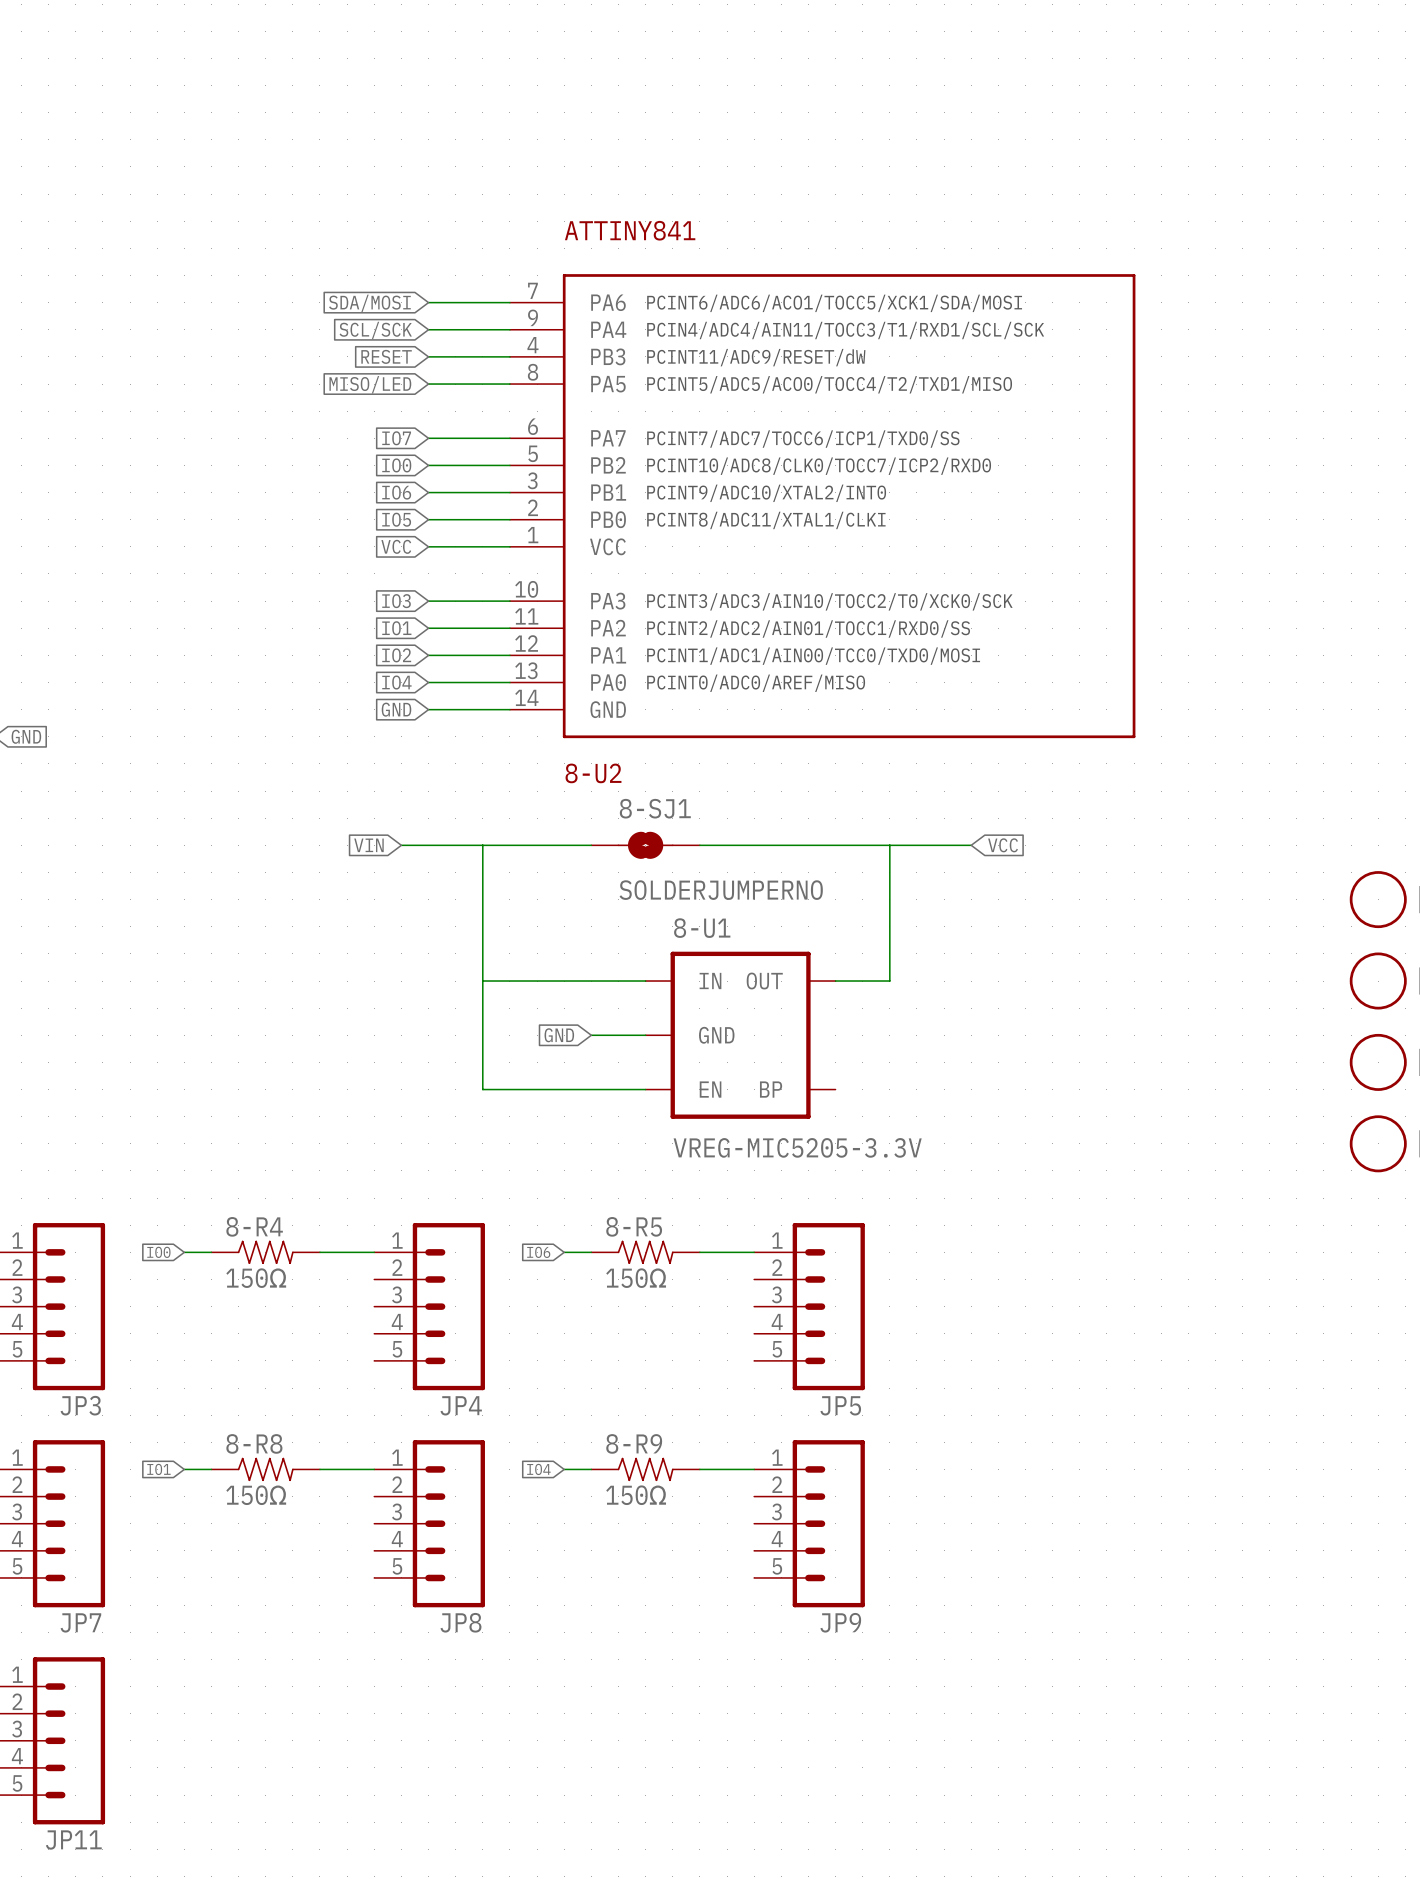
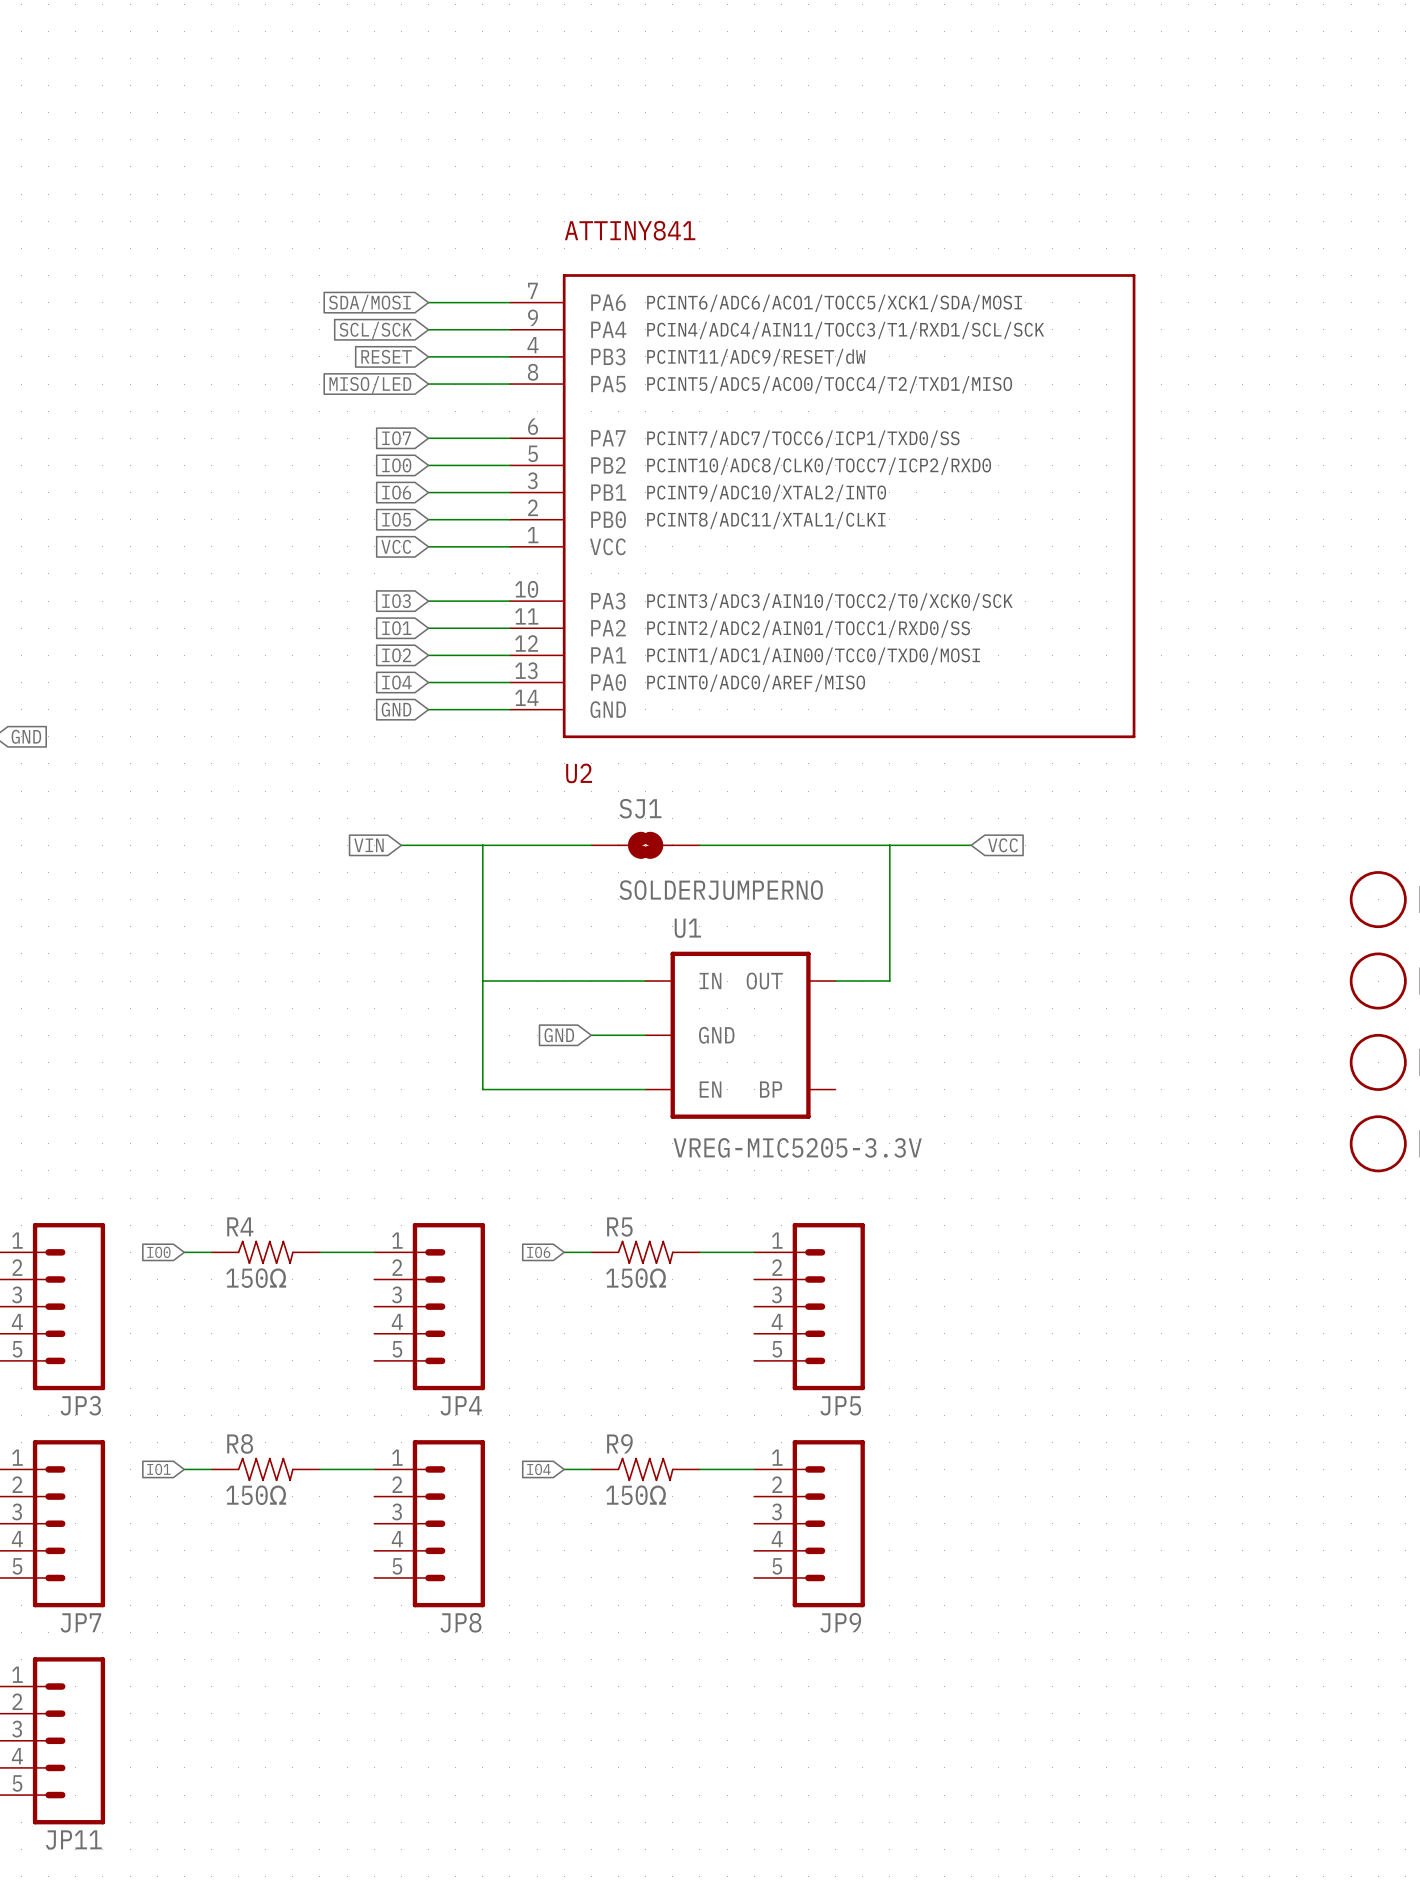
8-U2 name: 8-U2 (593, 773) -> U2 (579, 773)
8-SJ1 name: 8-SJ1 (655, 808) -> SJ1 (640, 808)
8-U1 name: 8-U1 (702, 928) -> U1 (687, 928)
8-R4 name: 8-R4 (254, 1226) -> R4 (240, 1226)
8-R5 name: 8-R5 (634, 1226) -> R5 (619, 1227)
8-R8 name: 8-R8 (254, 1443) -> R8 (240, 1443)
8-R9 name: 8-R9 (634, 1443) -> R9 (619, 1443)

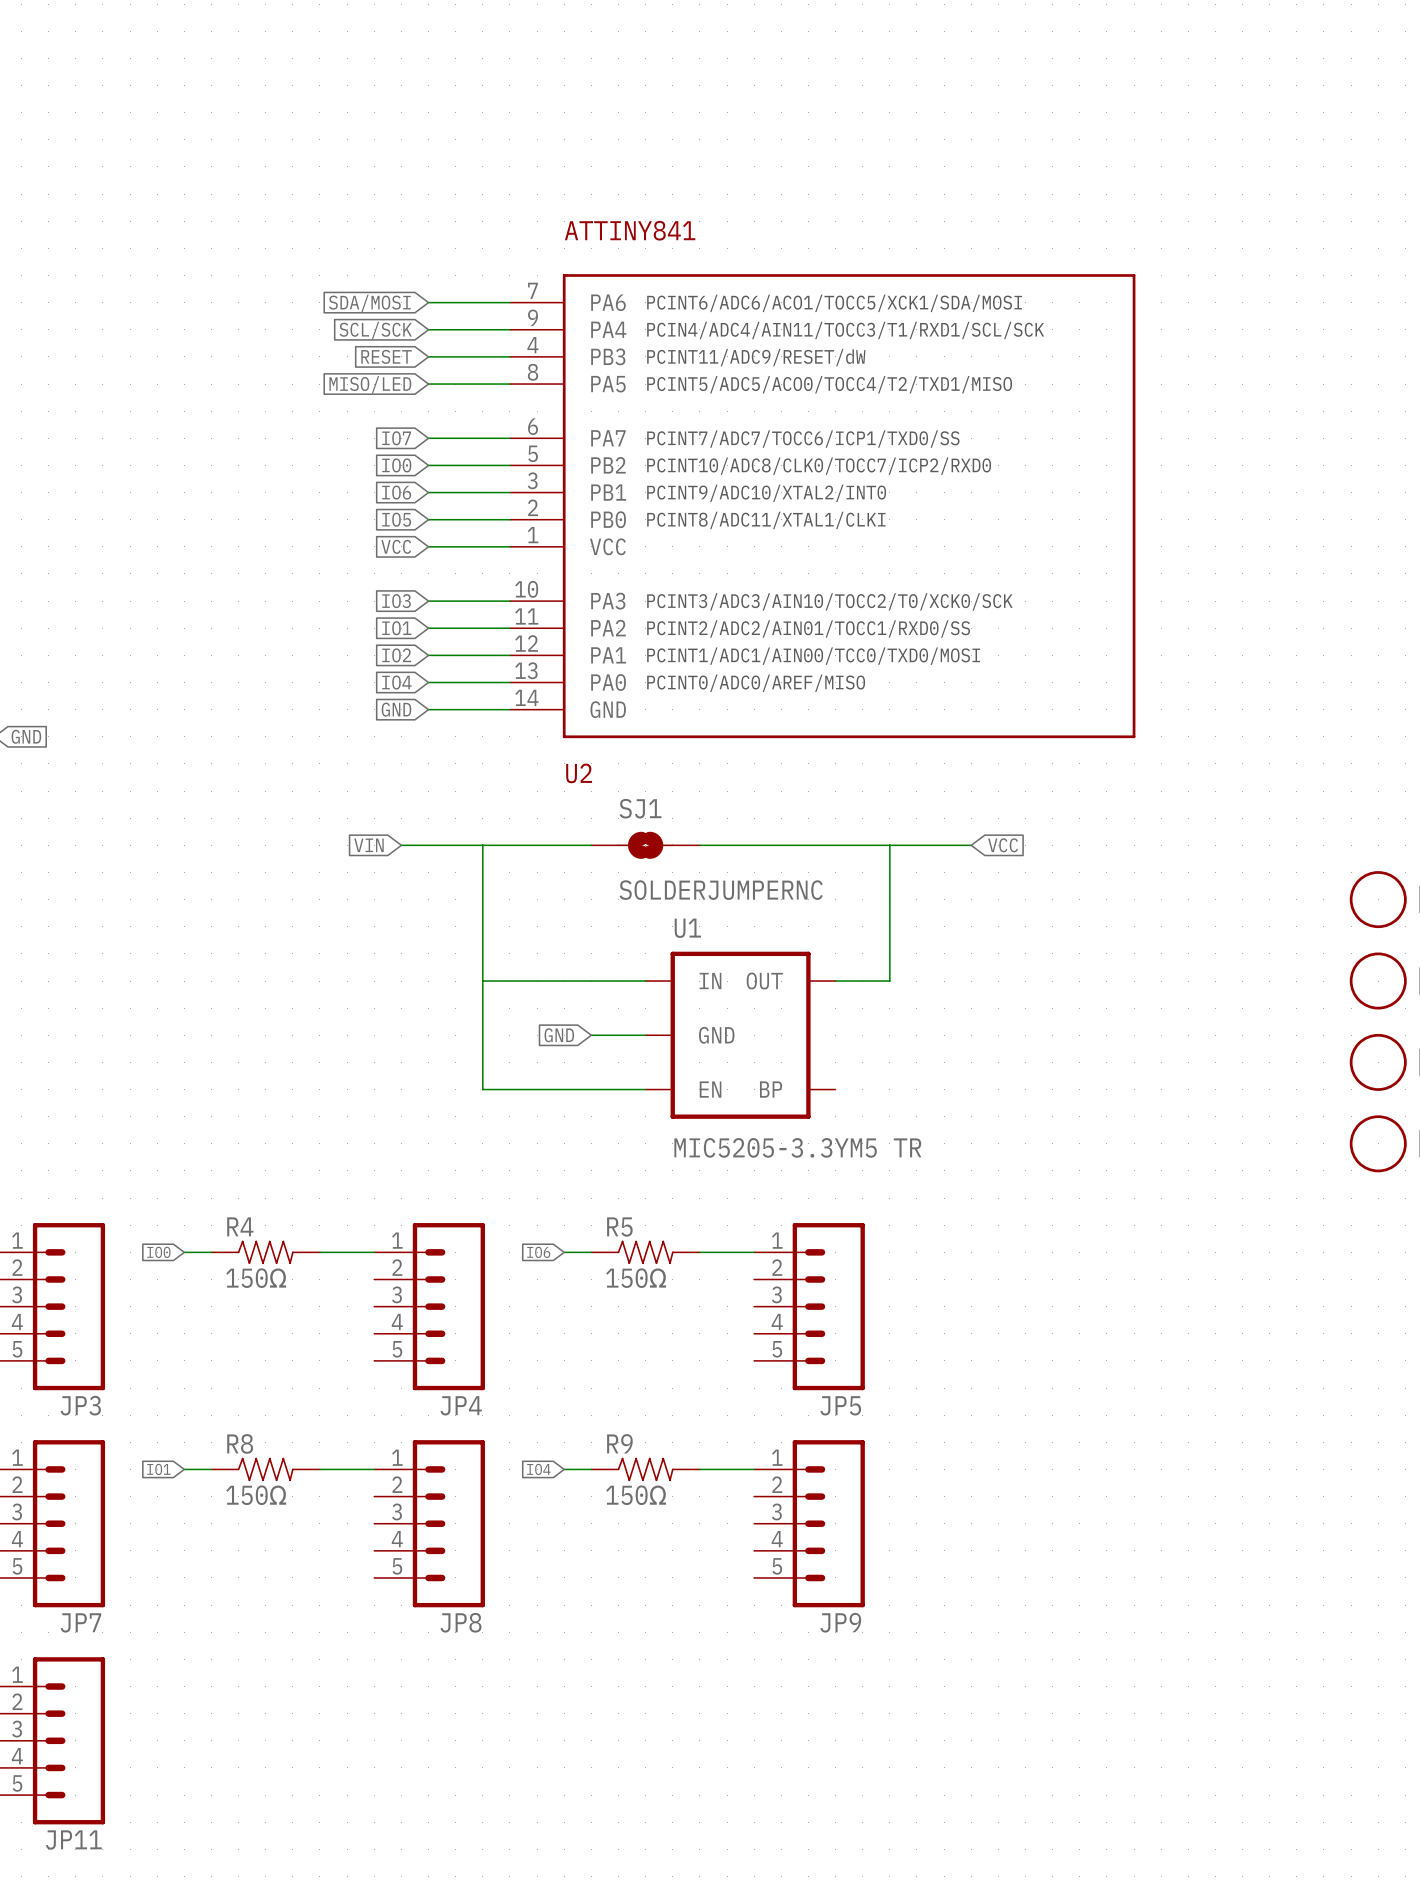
SJ1 value: SOLDERJUMPERNO (721, 890) -> SOLDERJUMPERNC (721, 890)
U1 value: VREG-MIC5205-3.3V (797, 1147) -> MIC5205-3.3YM5 TR (797, 1147)

